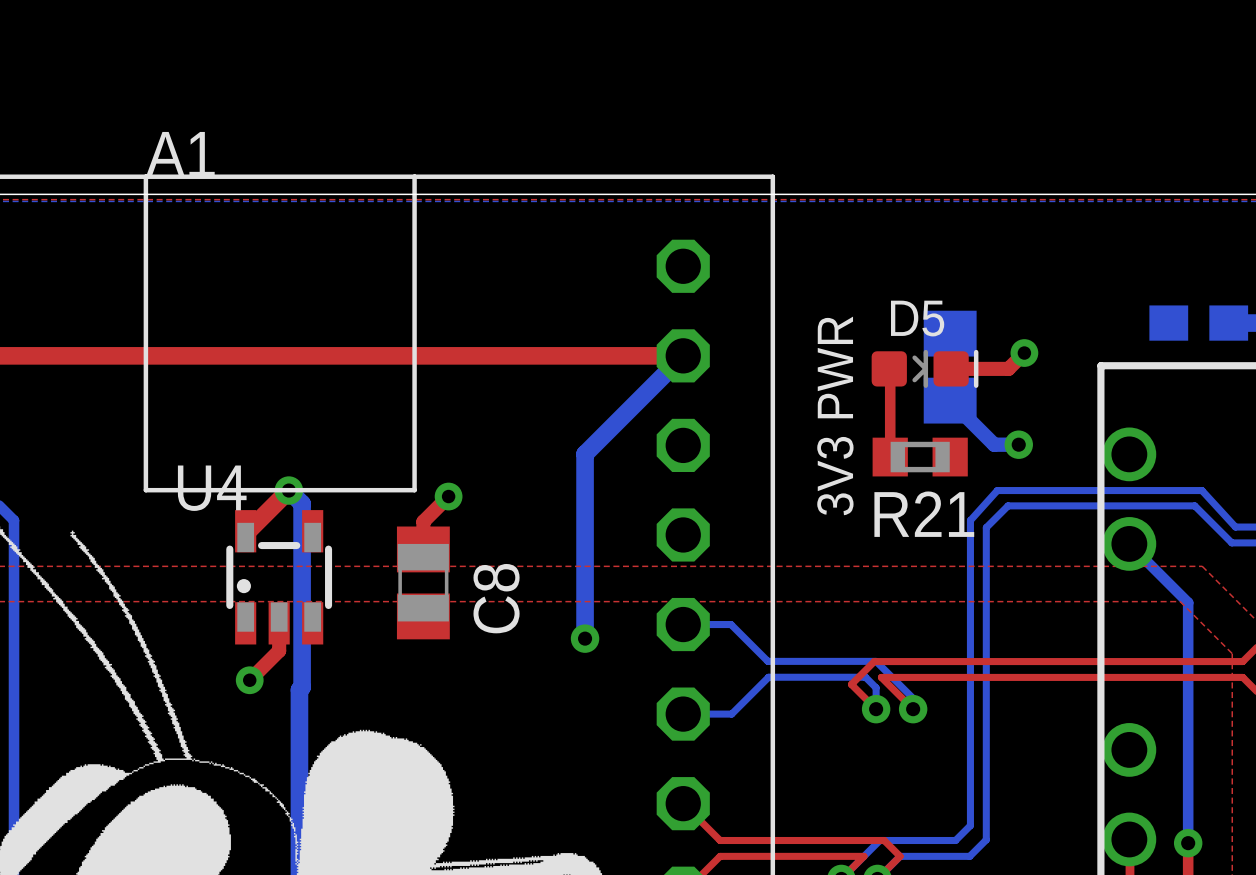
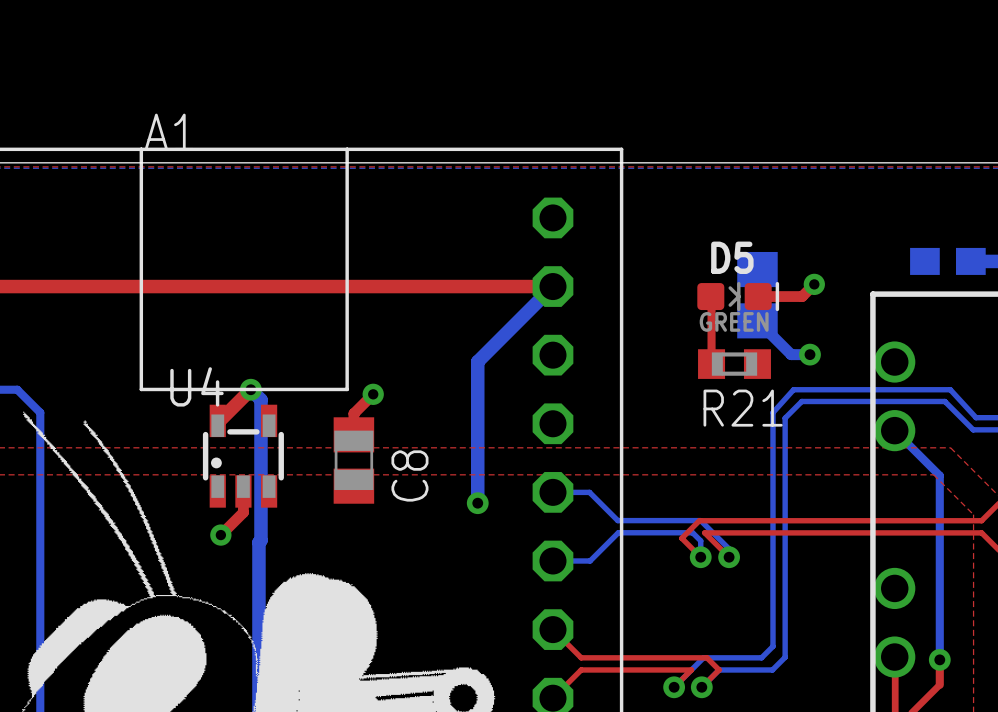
D5 value: none -> GREEN (734, 321)
text: 3V3 PWR (835, 415) -> none

